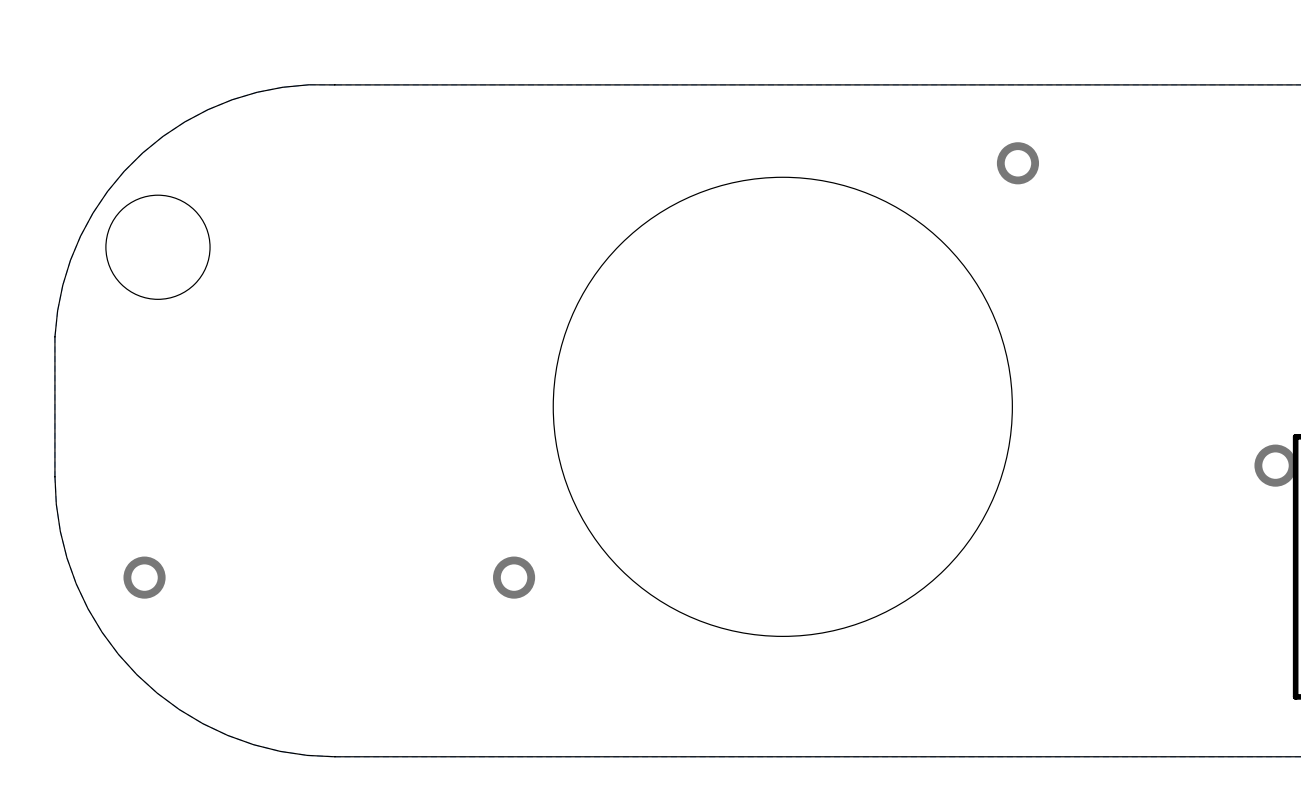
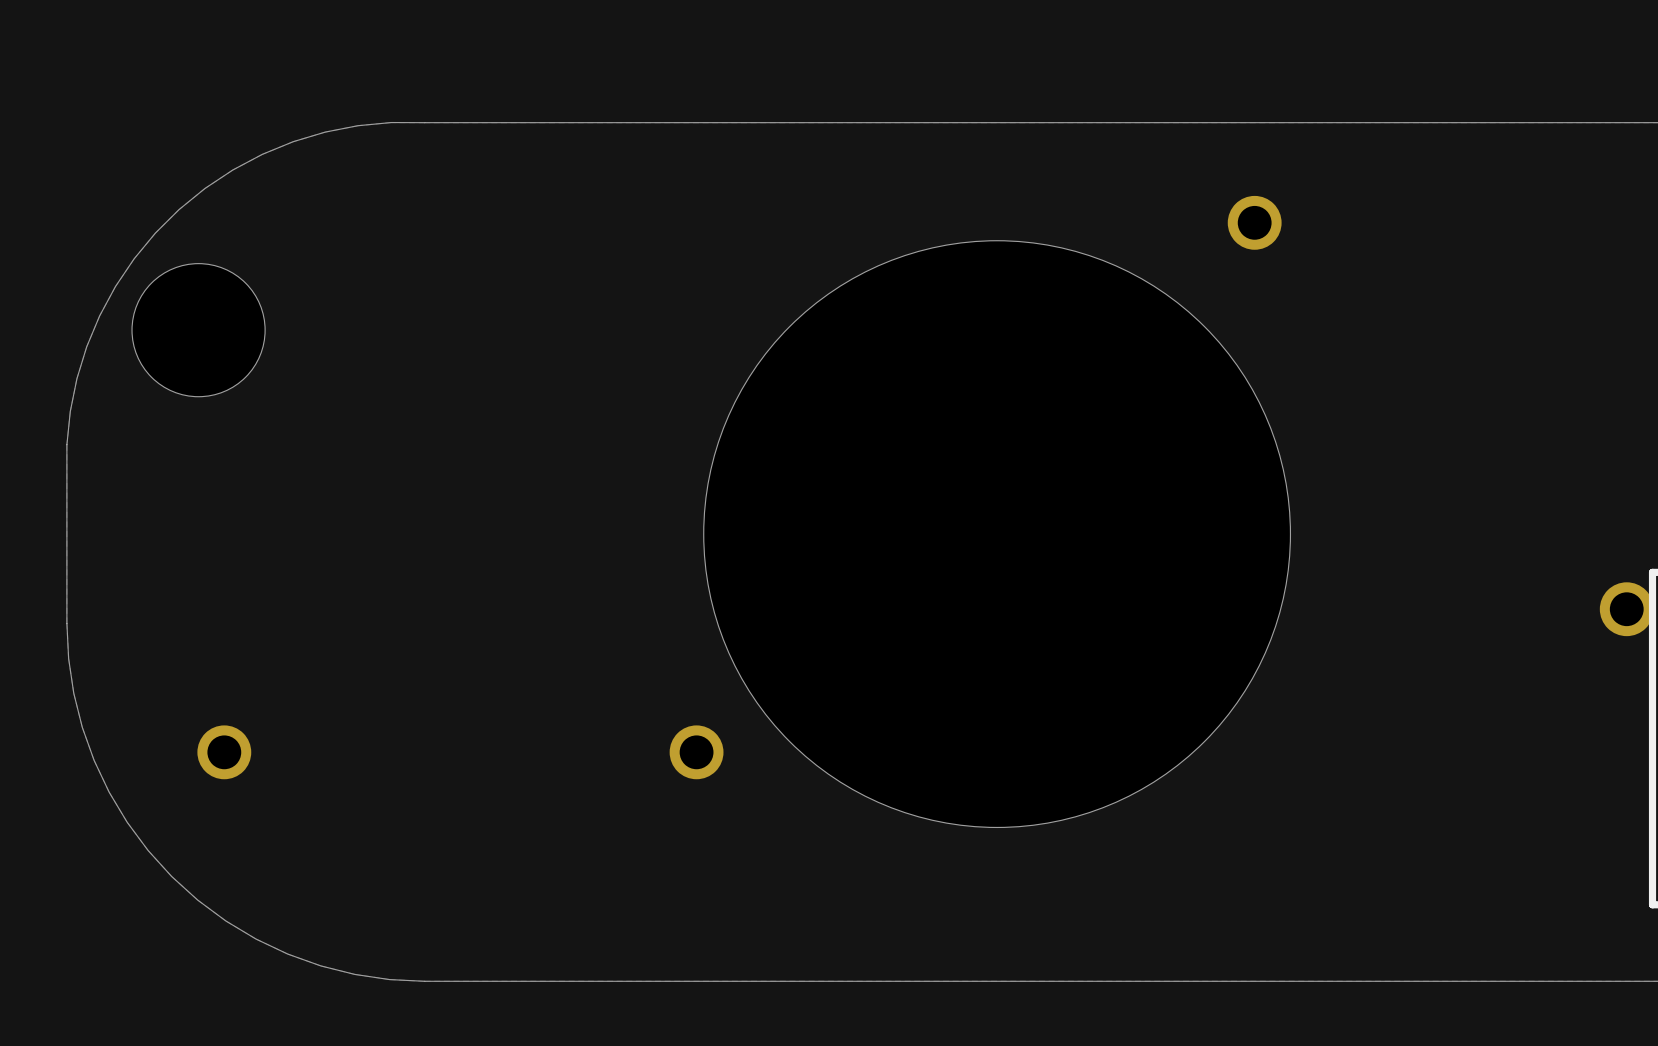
via position: (1017, 163) -> (1254, 222)
via position: (144, 577) -> (224, 752)
via position: (514, 577) -> (696, 752)

